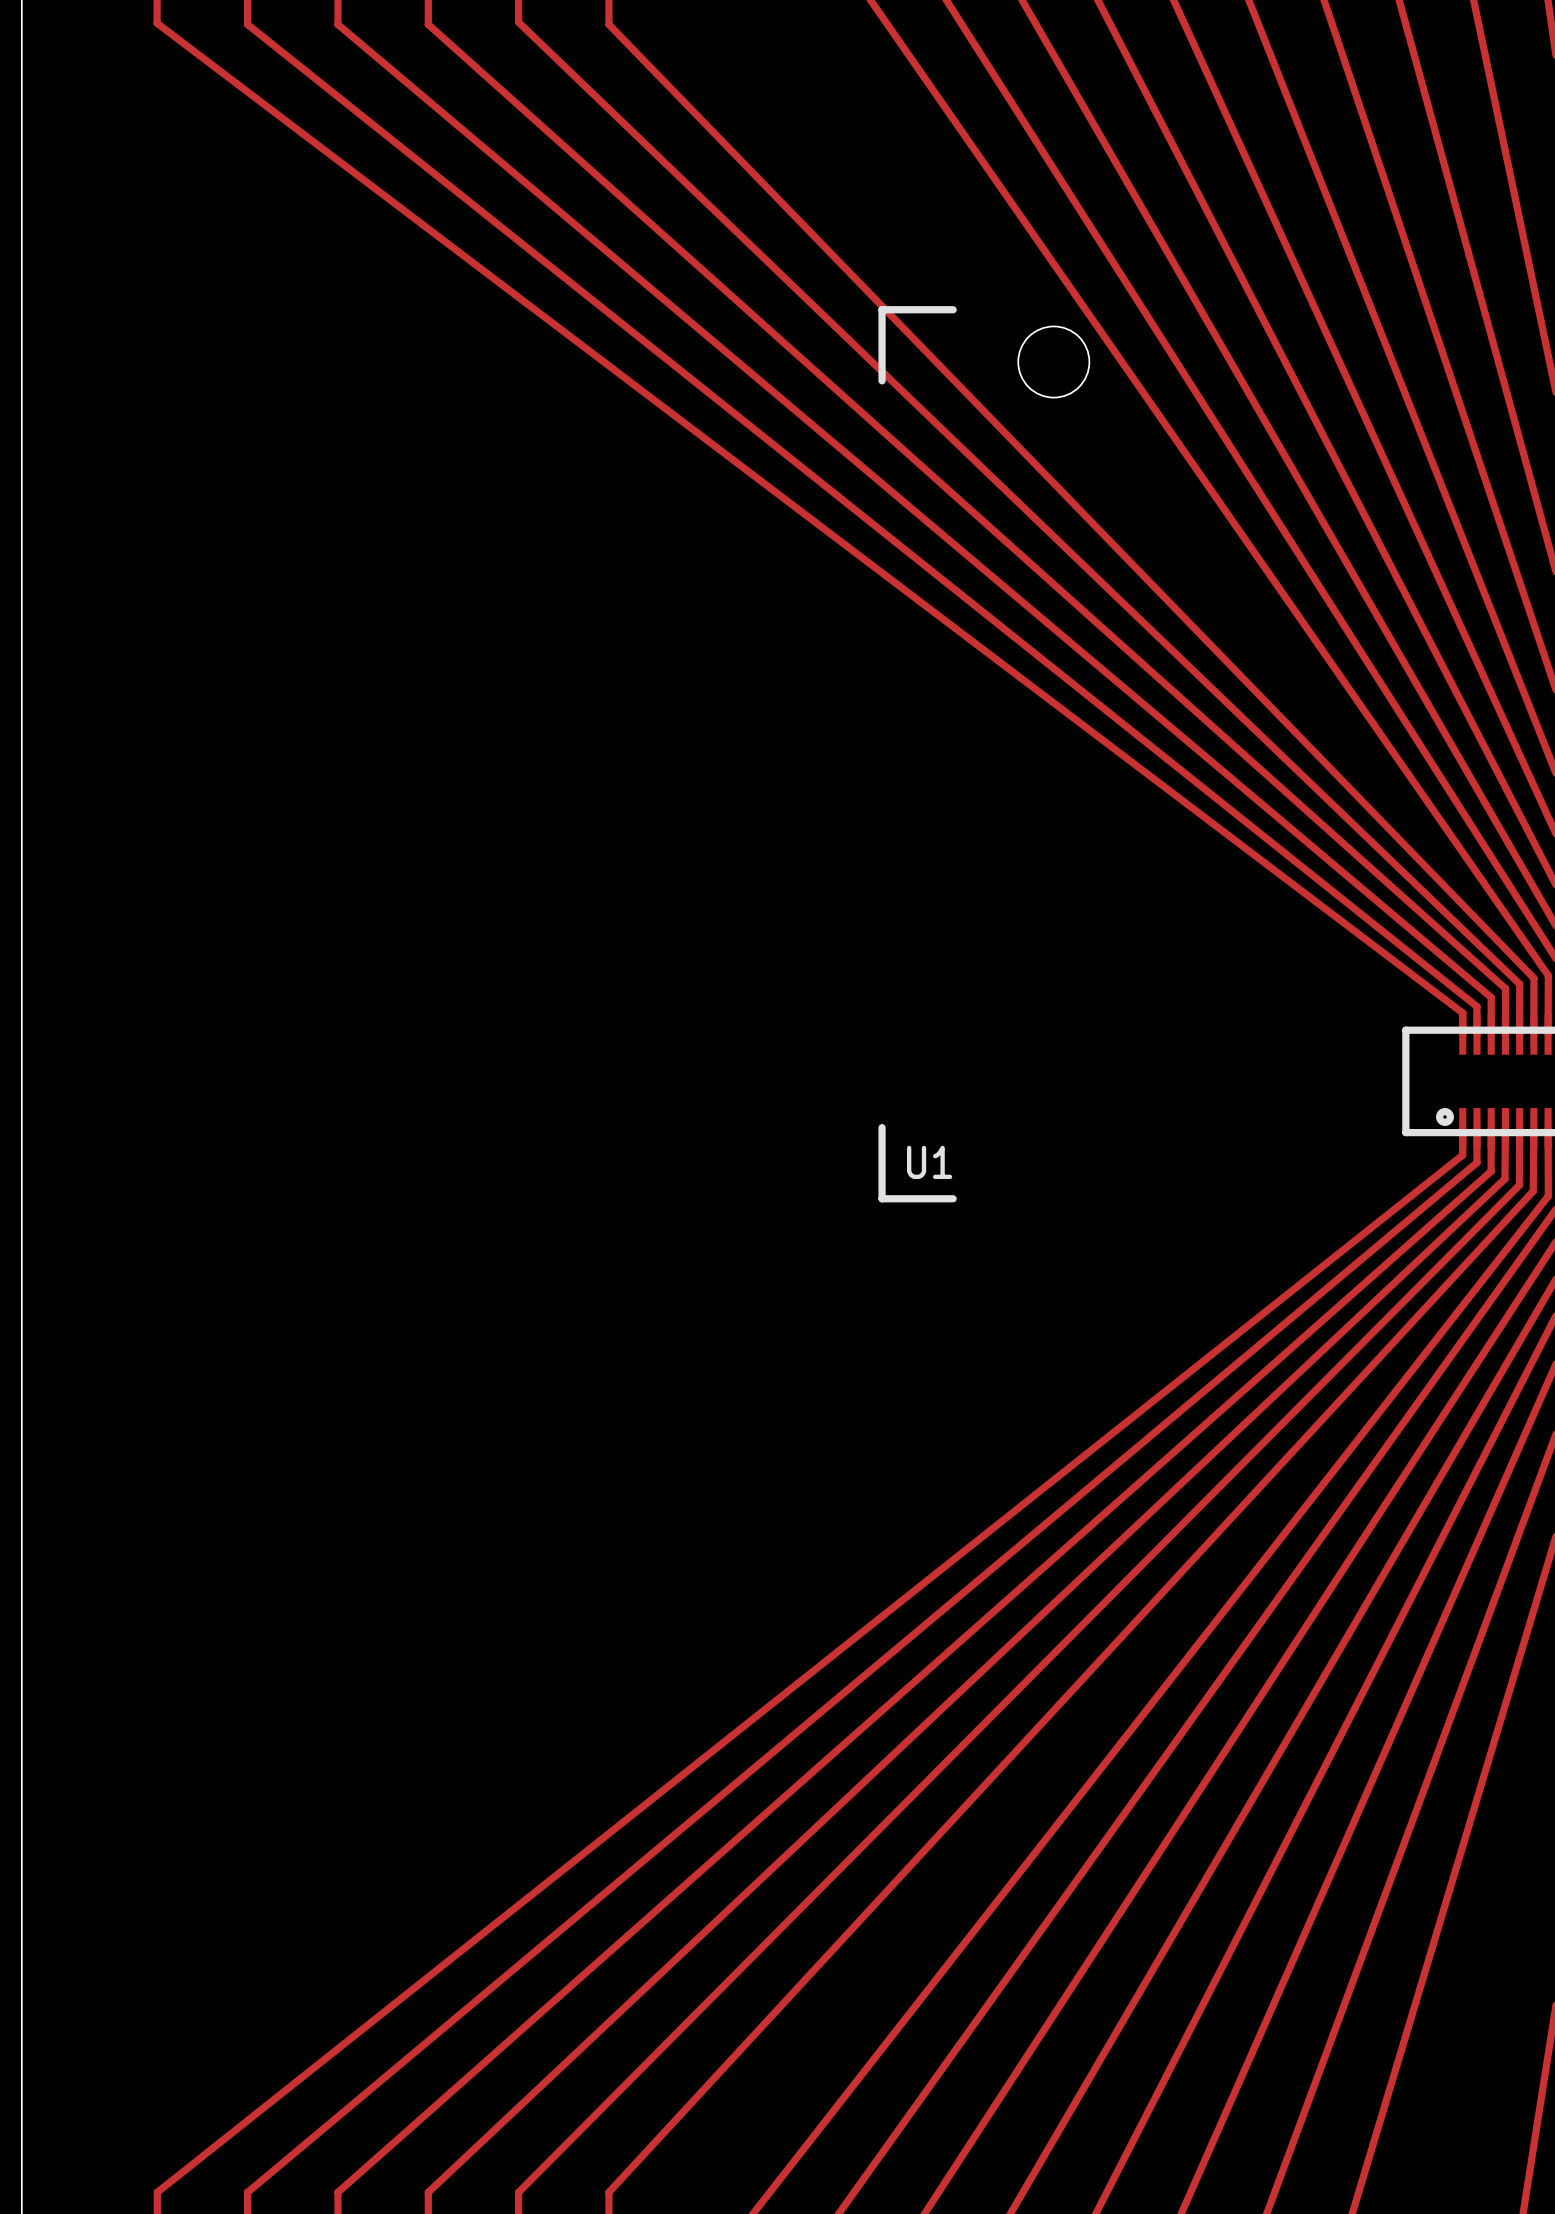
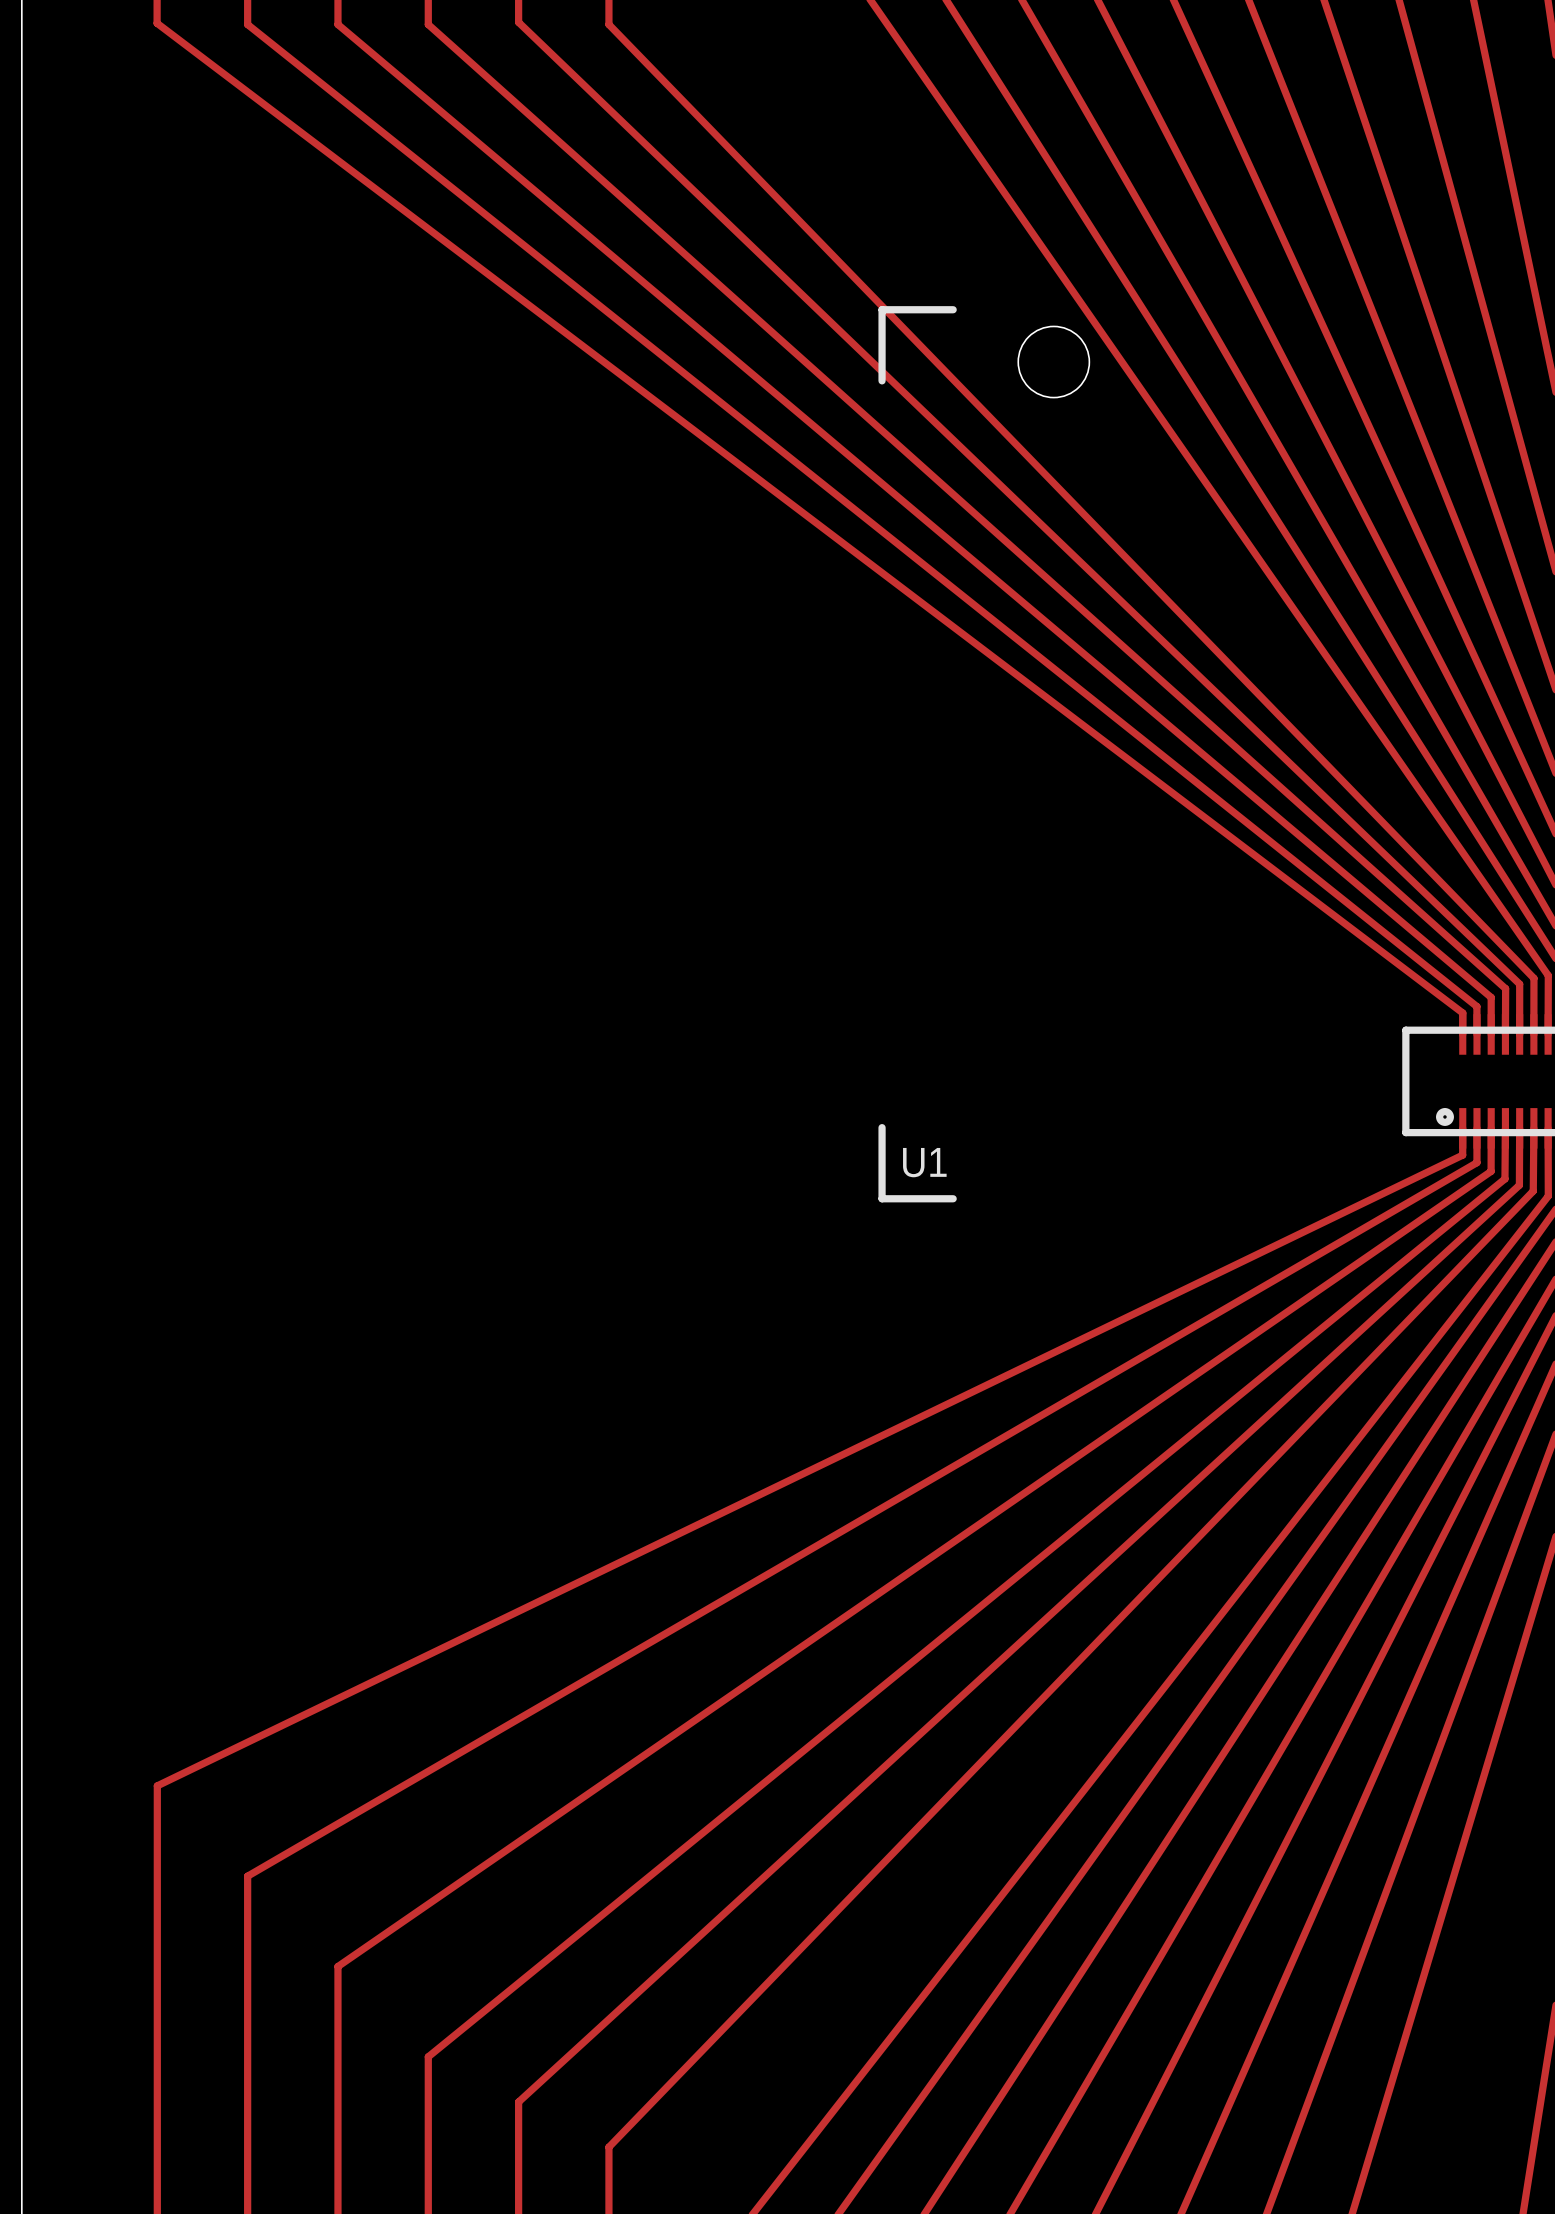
track: (1462, 1155) (157, 2192) -> (1462, 1155) (157, 1785) (157, 2192)
track: (1476, 1162) (247, 2192) -> (1476, 1162) (247, 1876) (247, 2192)
track: (1491, 1171) (337, 2192) -> (1491, 1171) (337, 1966) (337, 2192)
track: (1504, 1178) (428, 2192) -> (1504, 1178) (428, 2056) (428, 2192)
track: (1519, 1185) (518, 2192) -> (1519, 1185) (518, 2102) (518, 2192)
track: (1533, 1191) (608, 2192) -> (1533, 1191) (608, 2147) (608, 2192)

